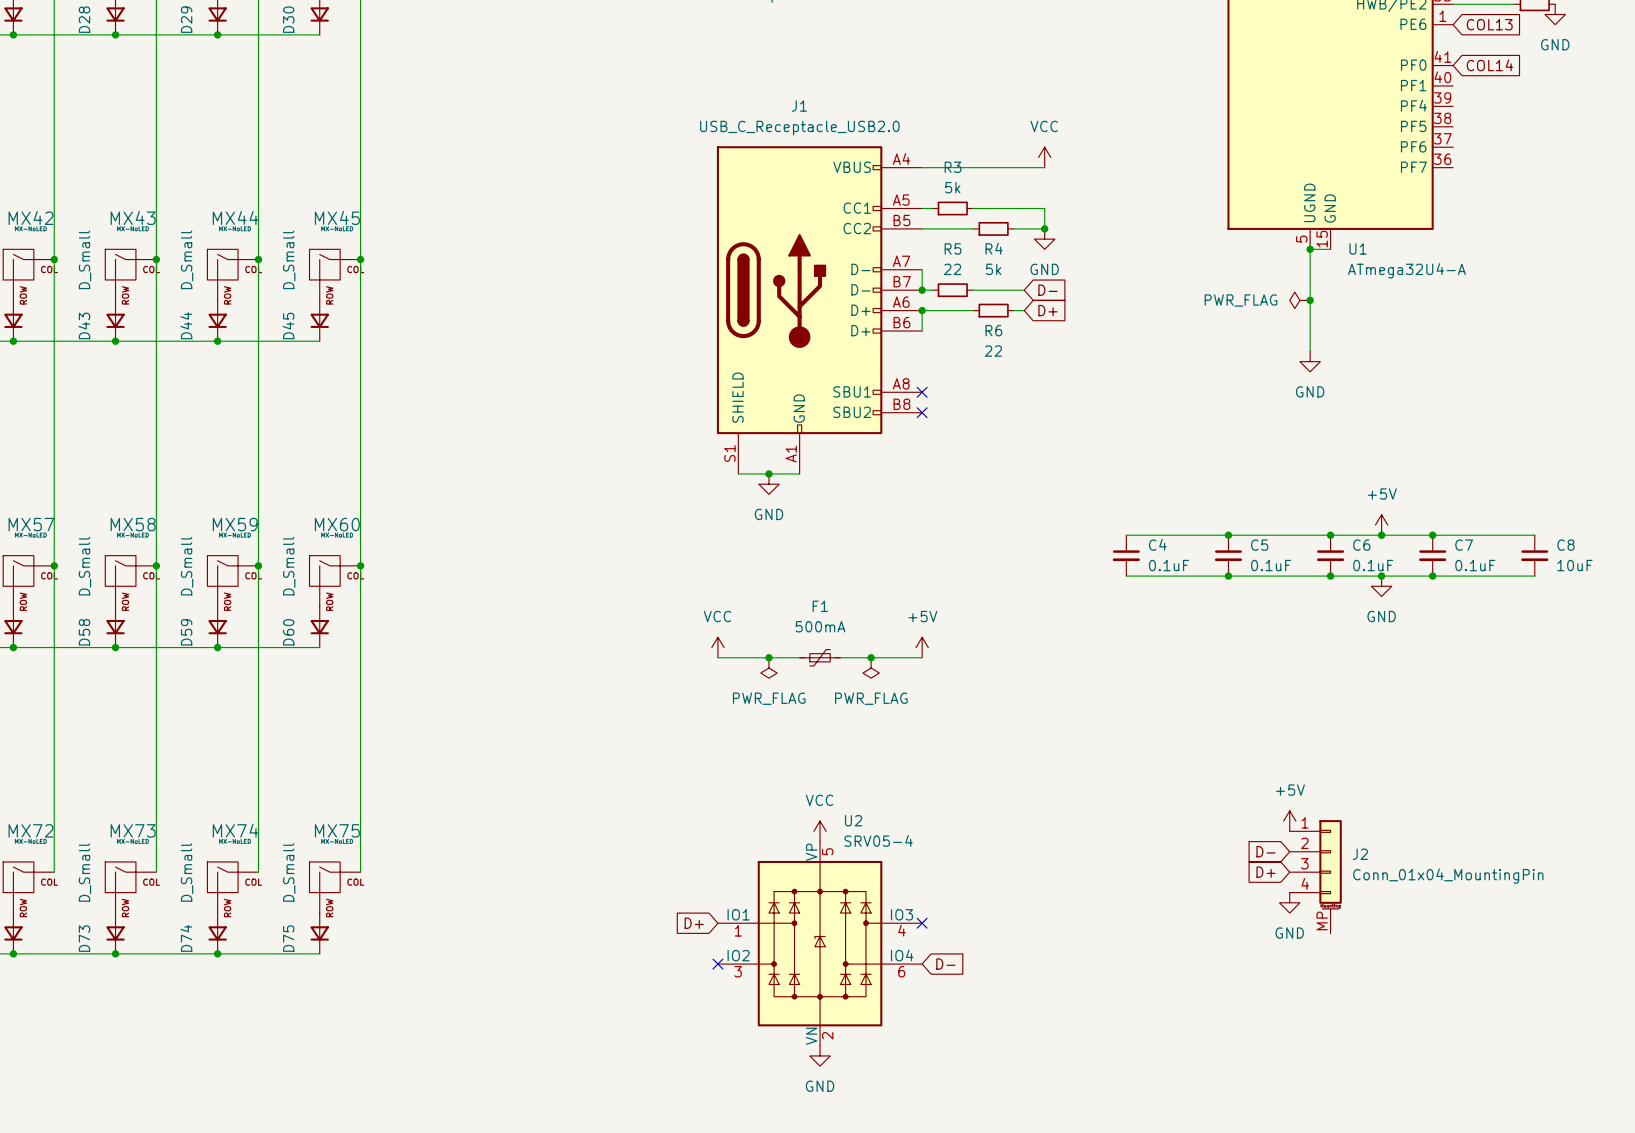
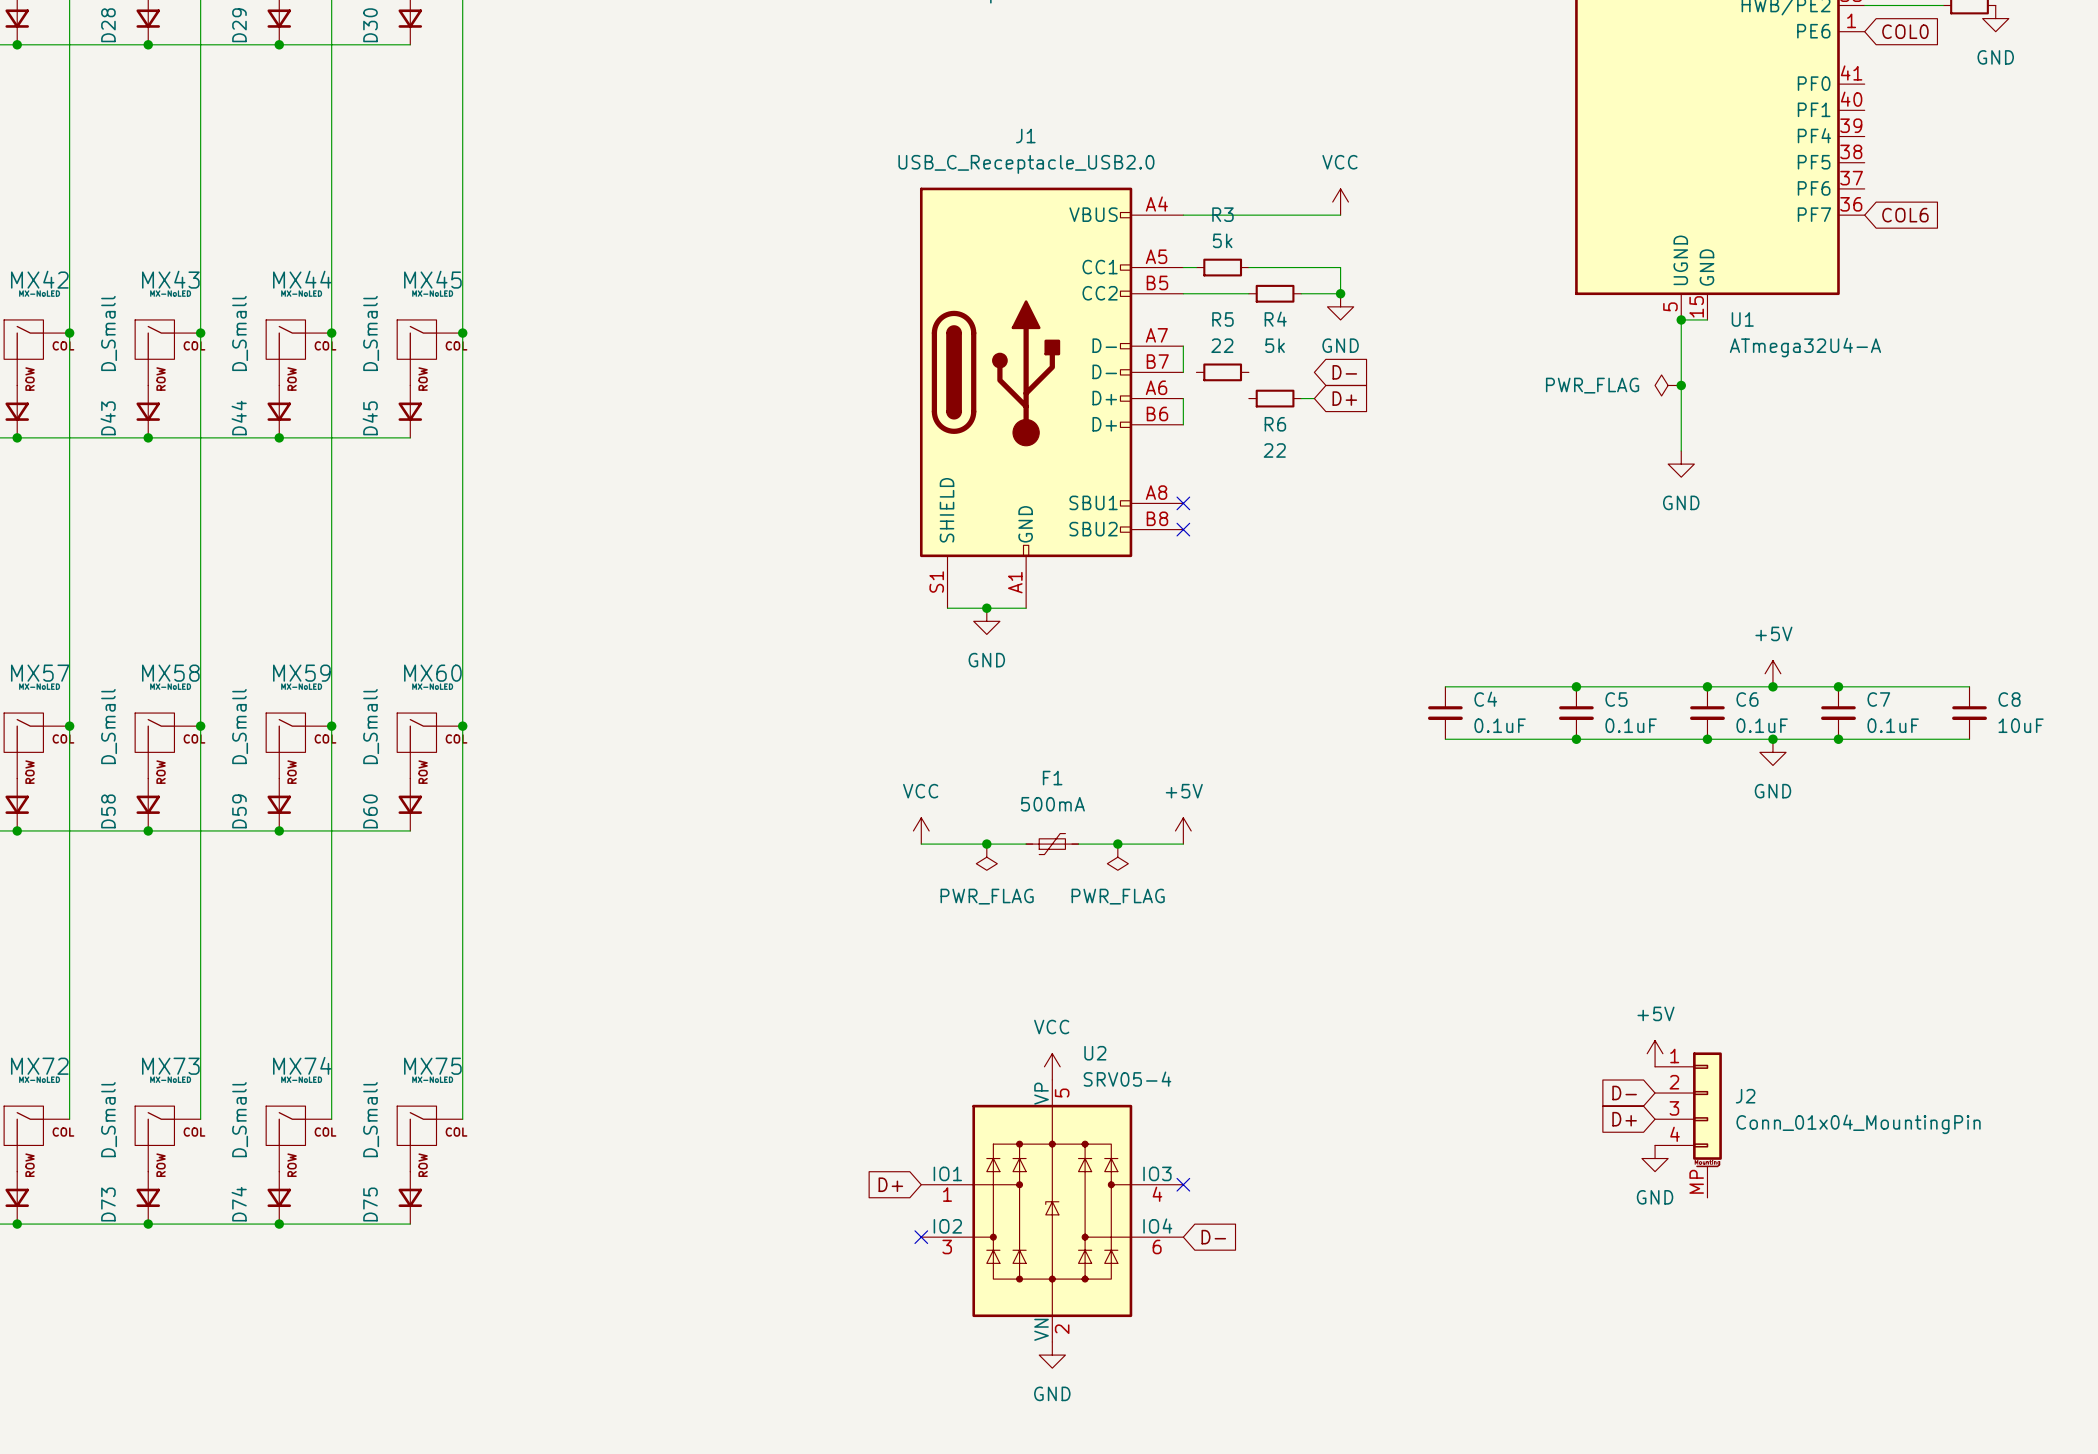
global label: COL13 (1489, 24) -> COL0 (1905, 31)
global label: COL14 (1489, 65) -> none
global label: none -> COL6 (1905, 215)
wire: (922, 290) (932, 290) -> none
junction: (922, 290) -> none
wire: (973, 290) (1024, 290) -> none
wire: (922, 310) (973, 310) -> none
junction: (922, 310) -> none

